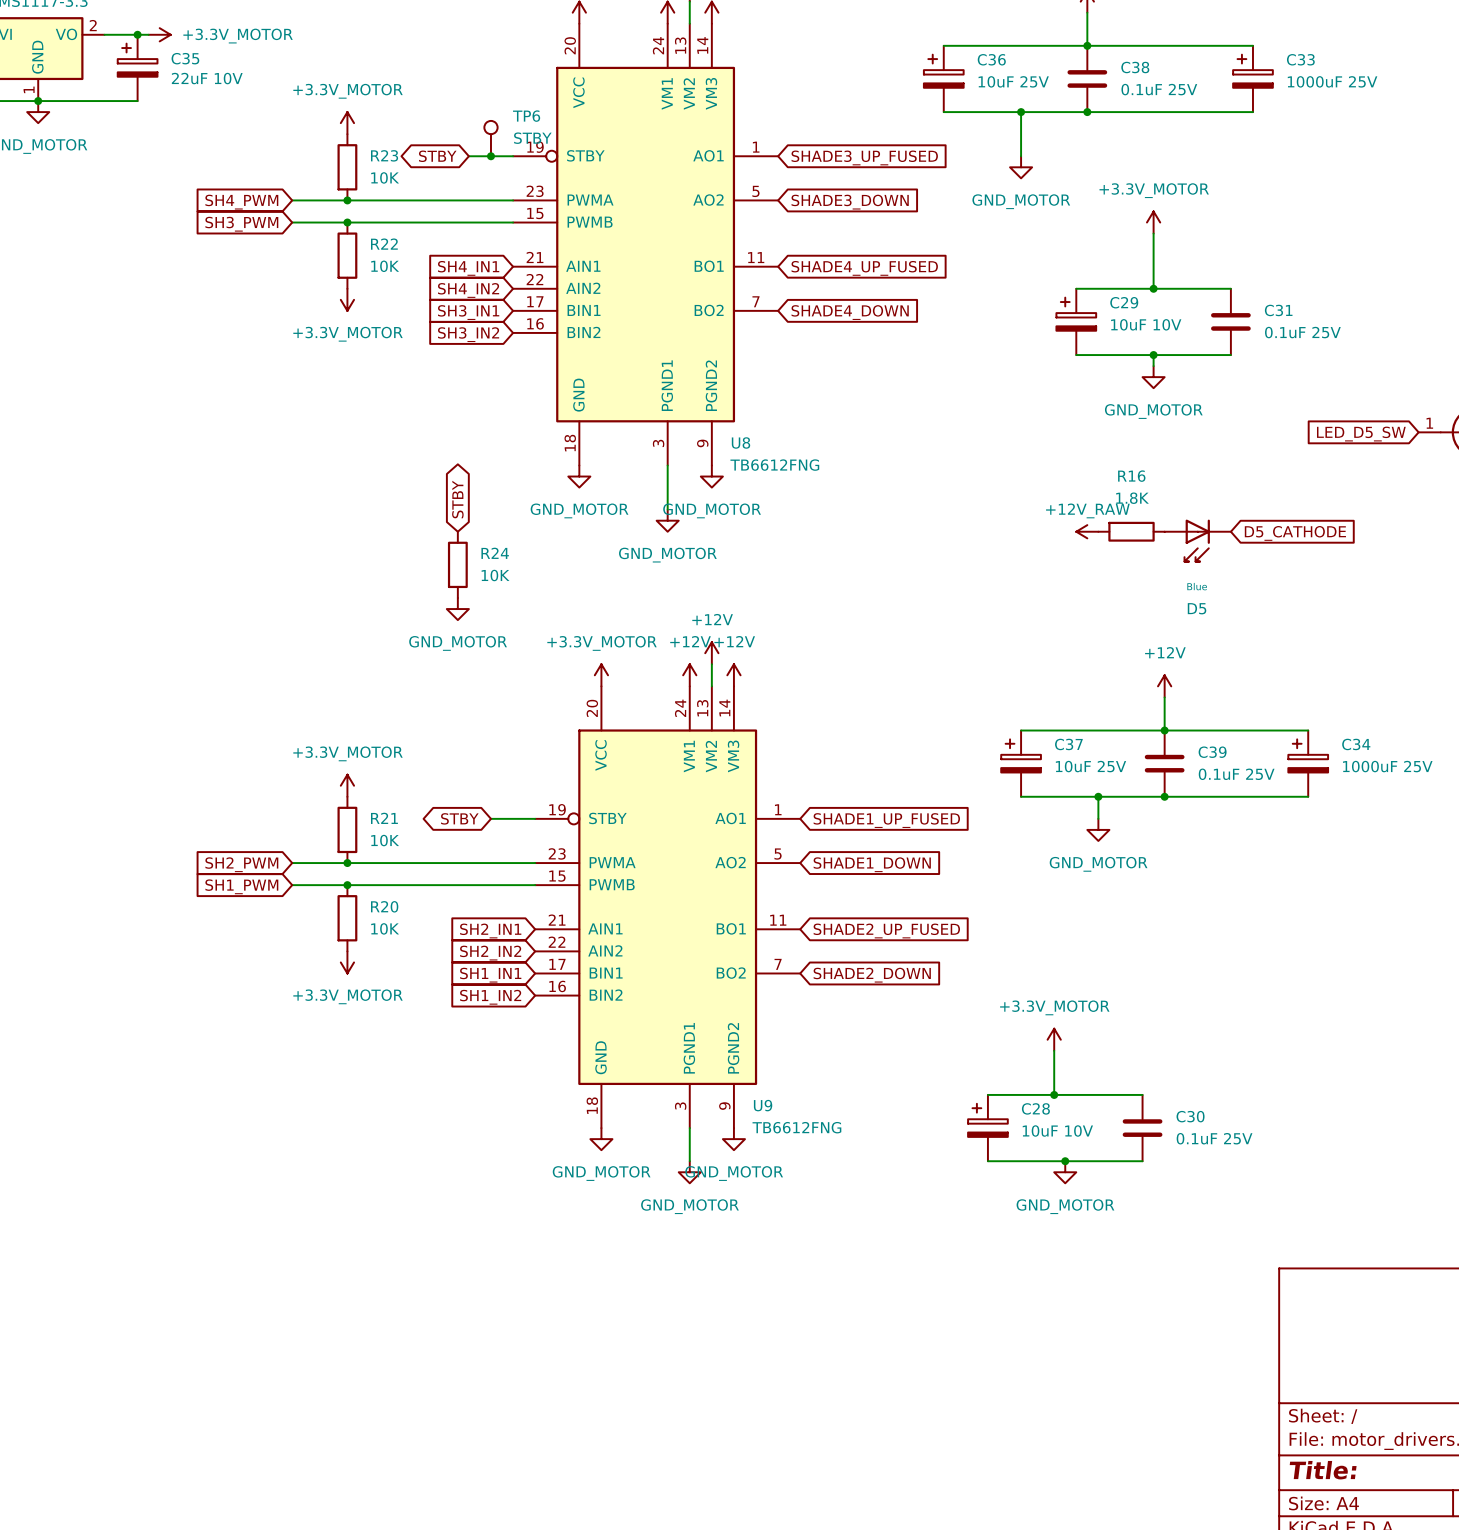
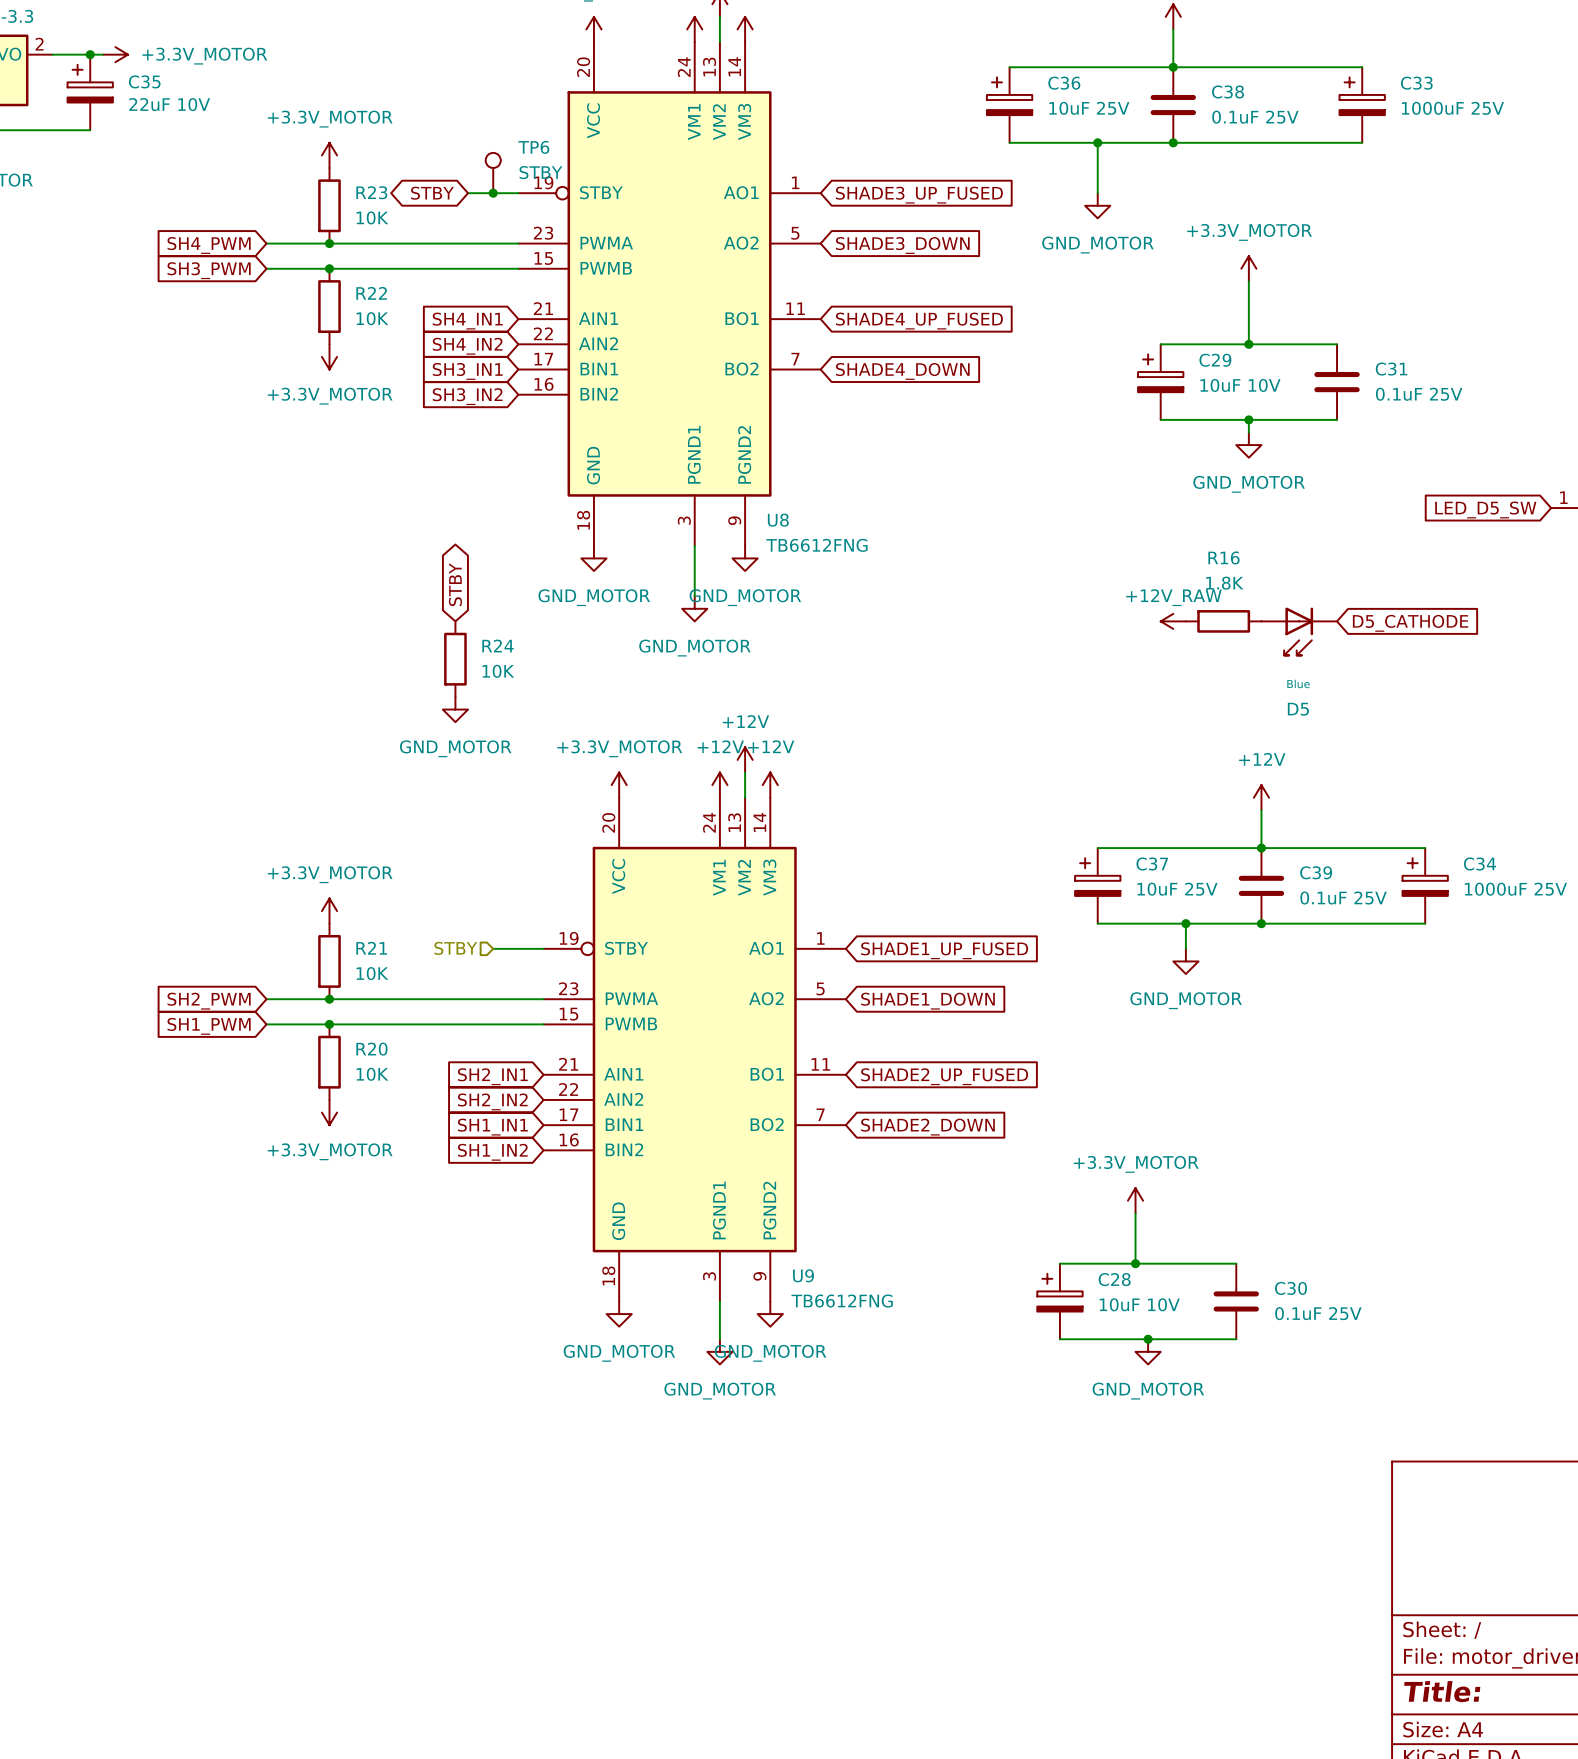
hierarchical label: none -> STBY (455, 948)
global label: STBY (459, 818) -> none

